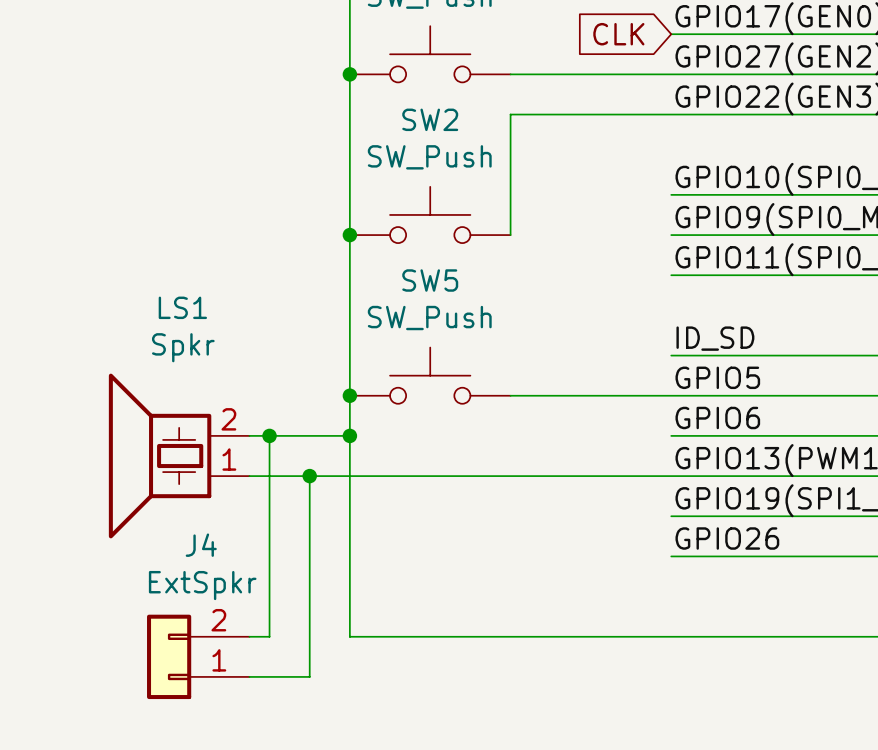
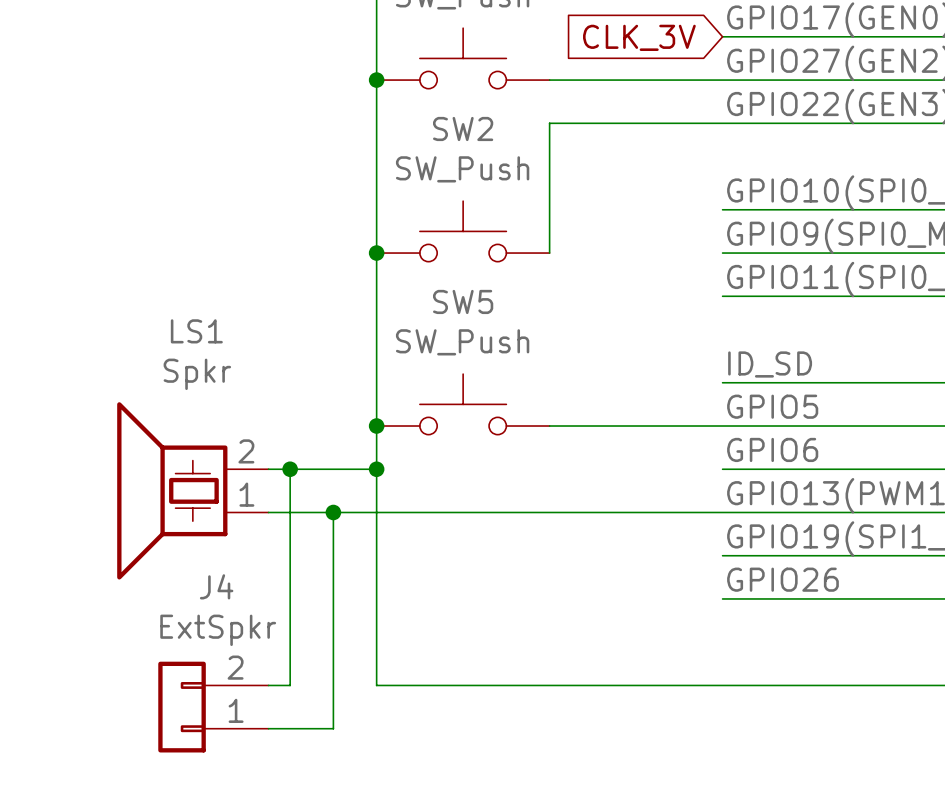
global label: CLK (618, 34) -> CLK_3V (639, 37)

